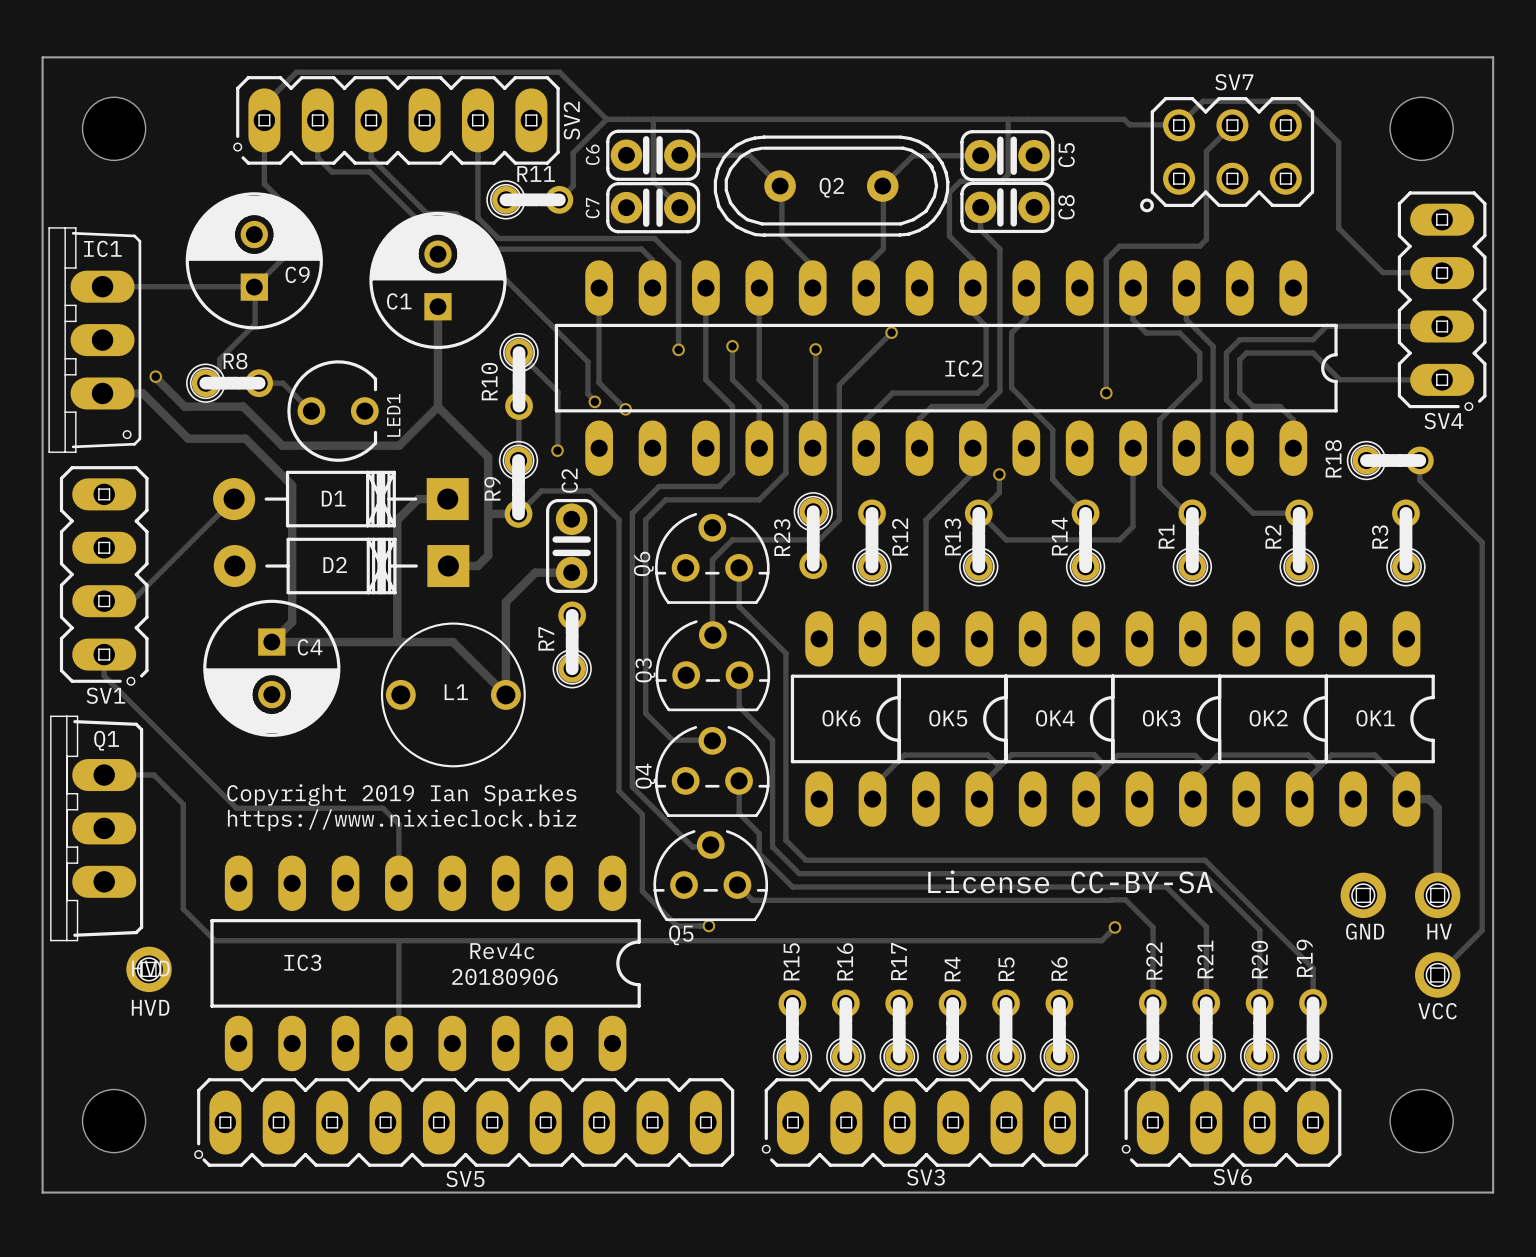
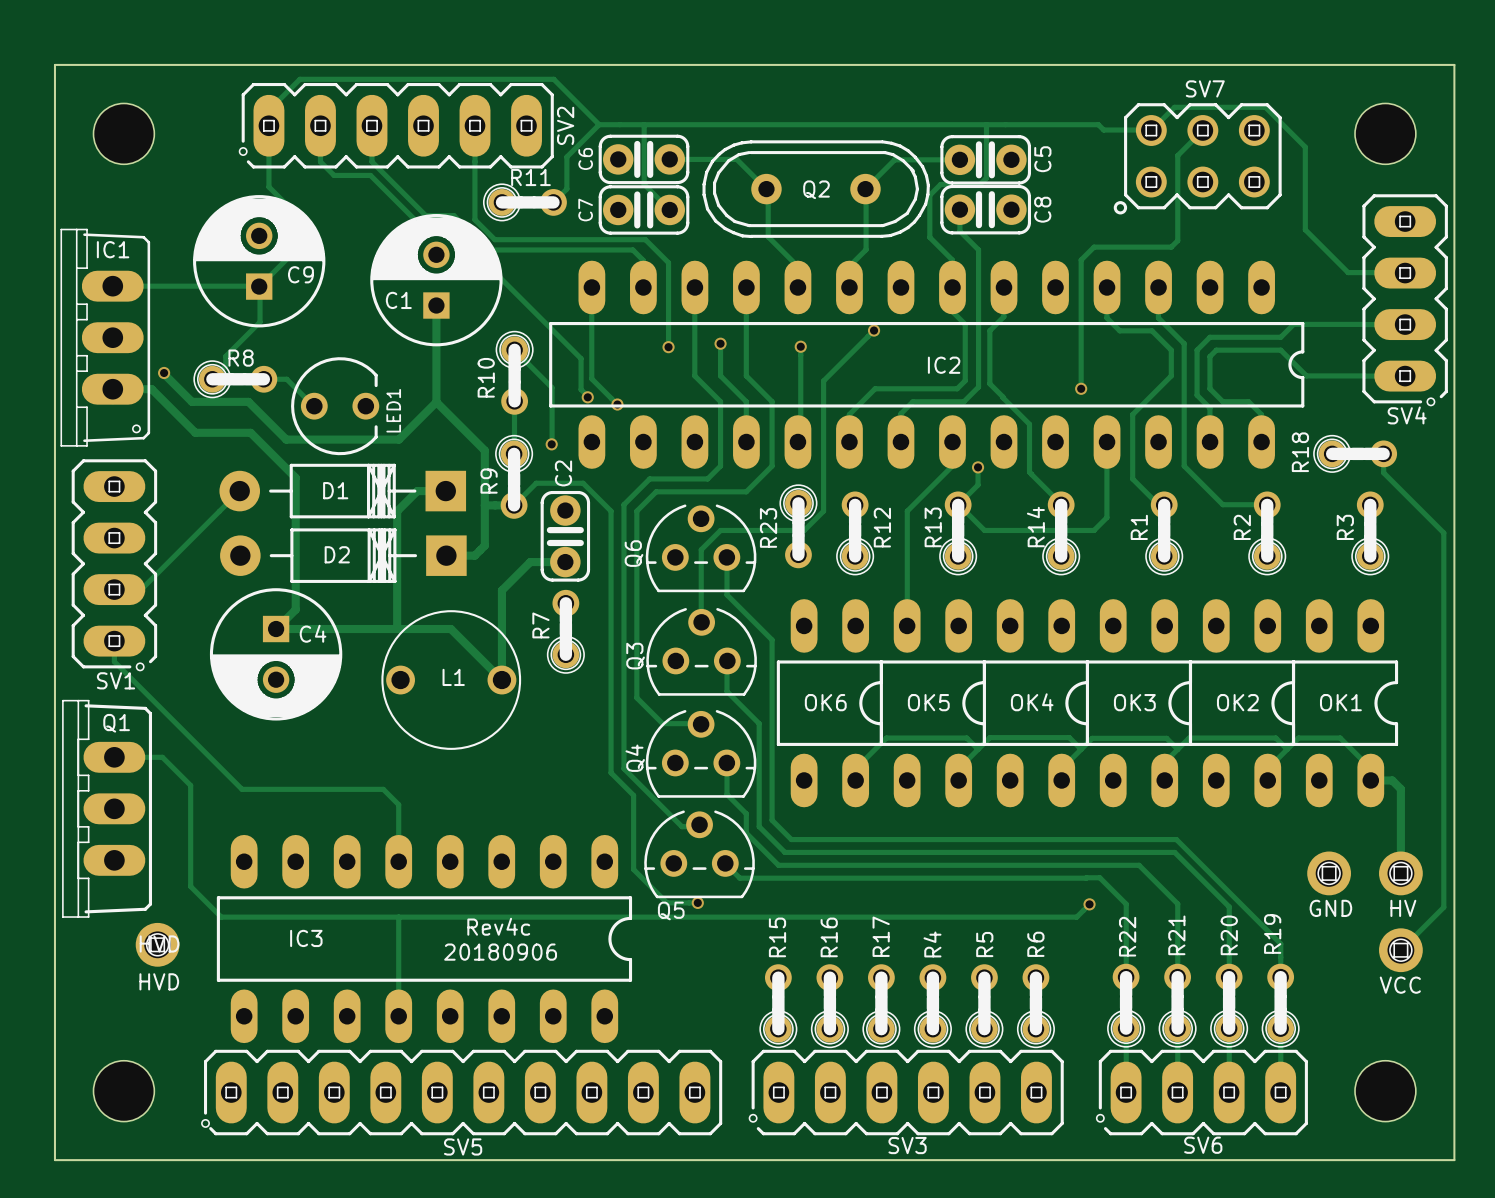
text: Copyright 2019 Ian Sparkes (401, 795) -> none
text: https://www.nixieclock.biz (402, 820) -> none
text: License CC-BY-SA (1070, 881) -> none

